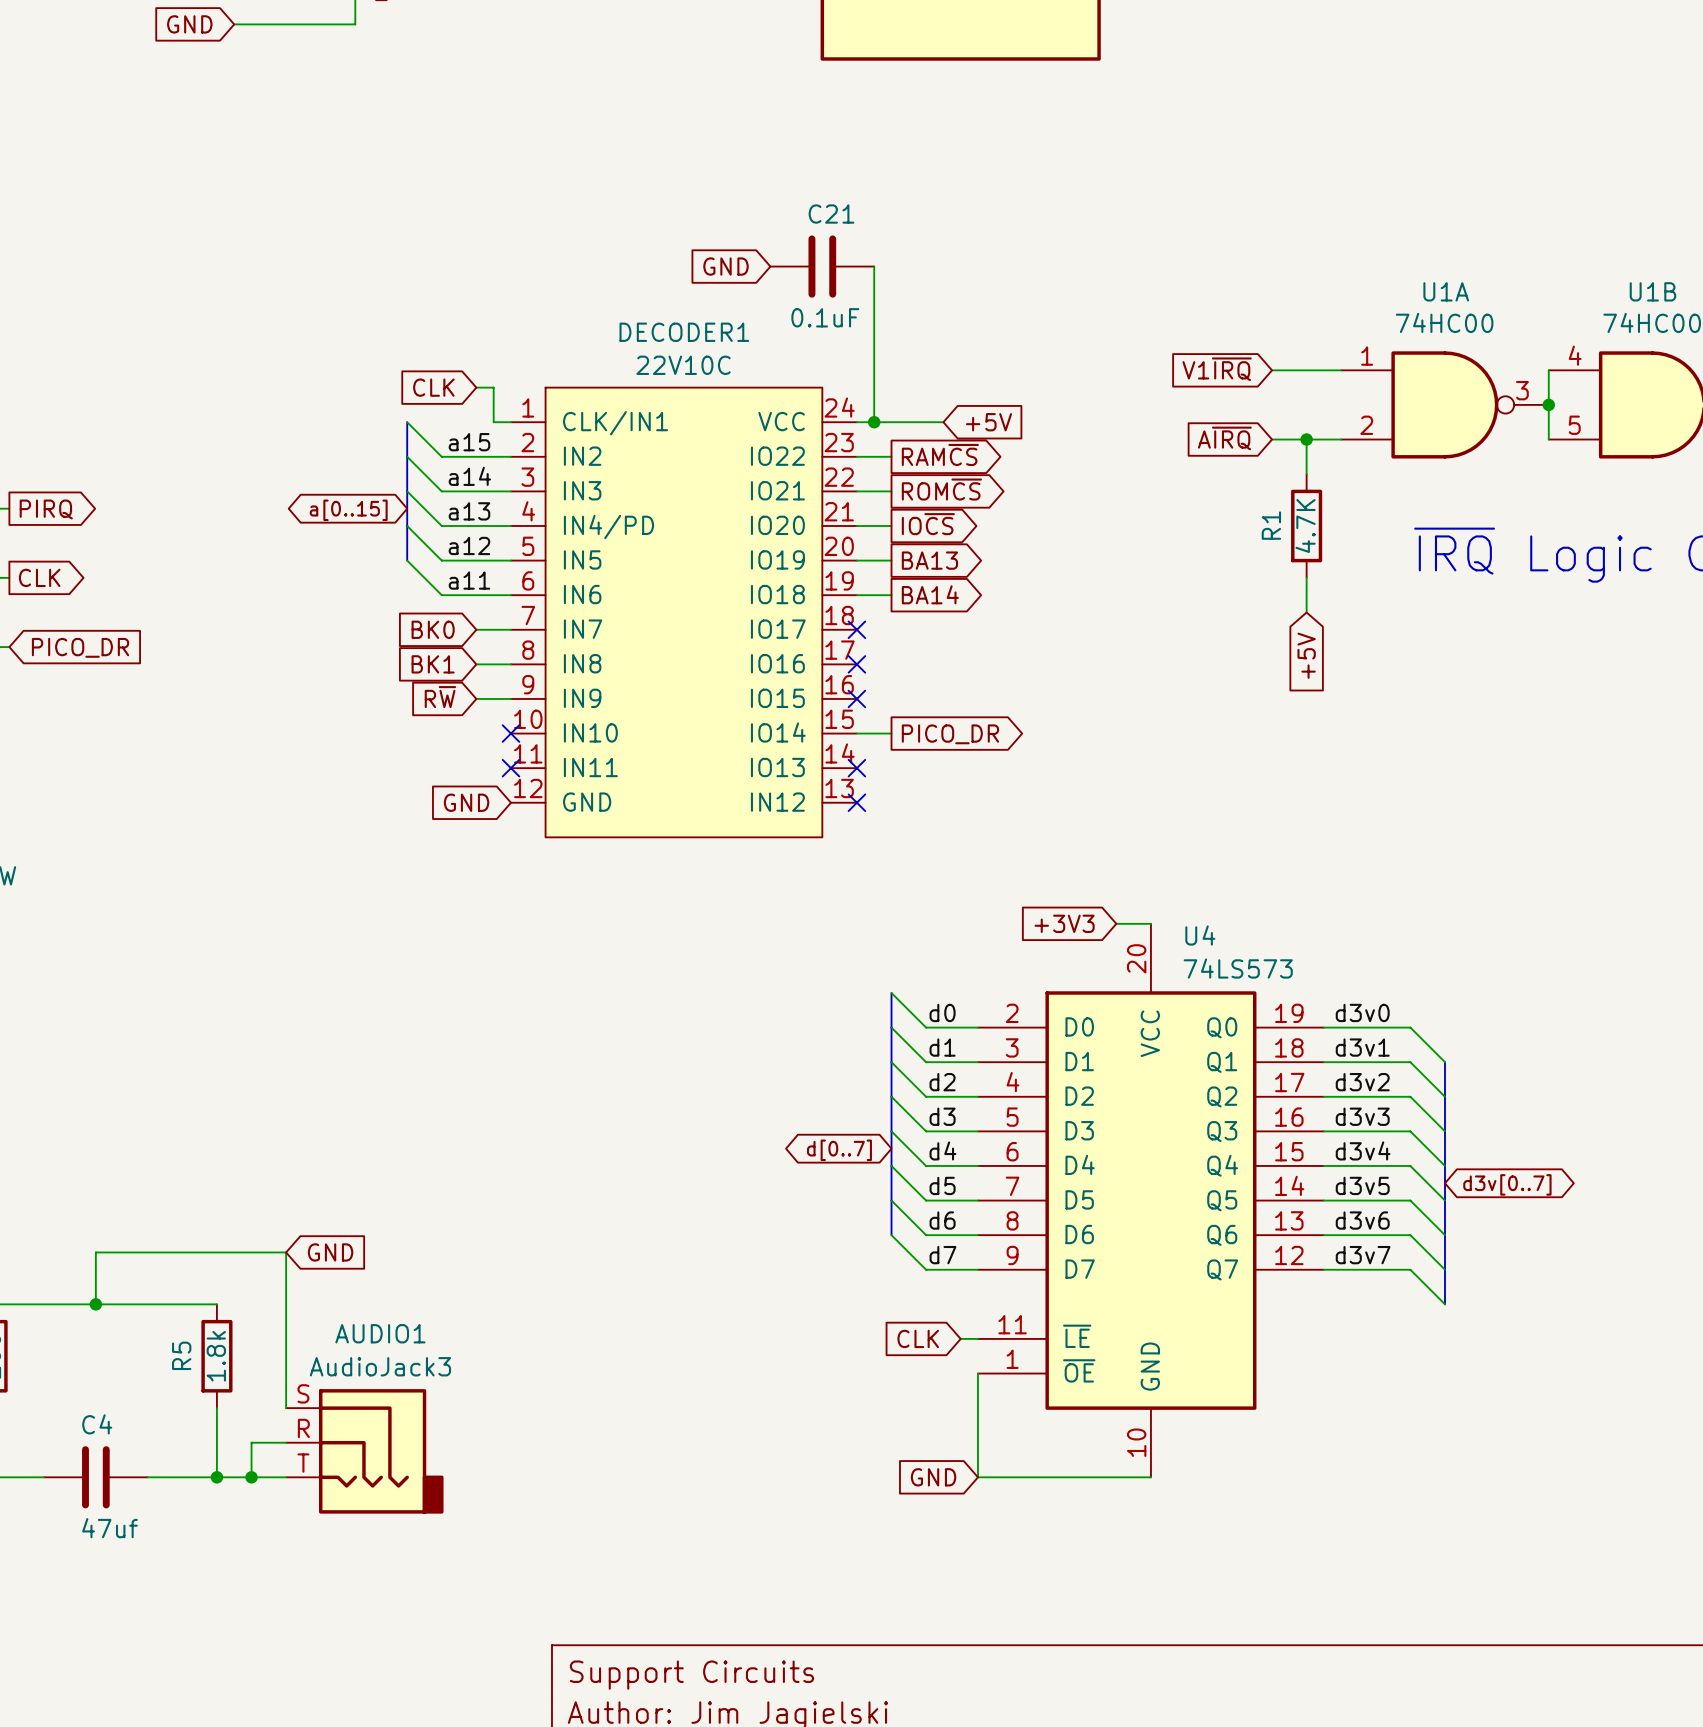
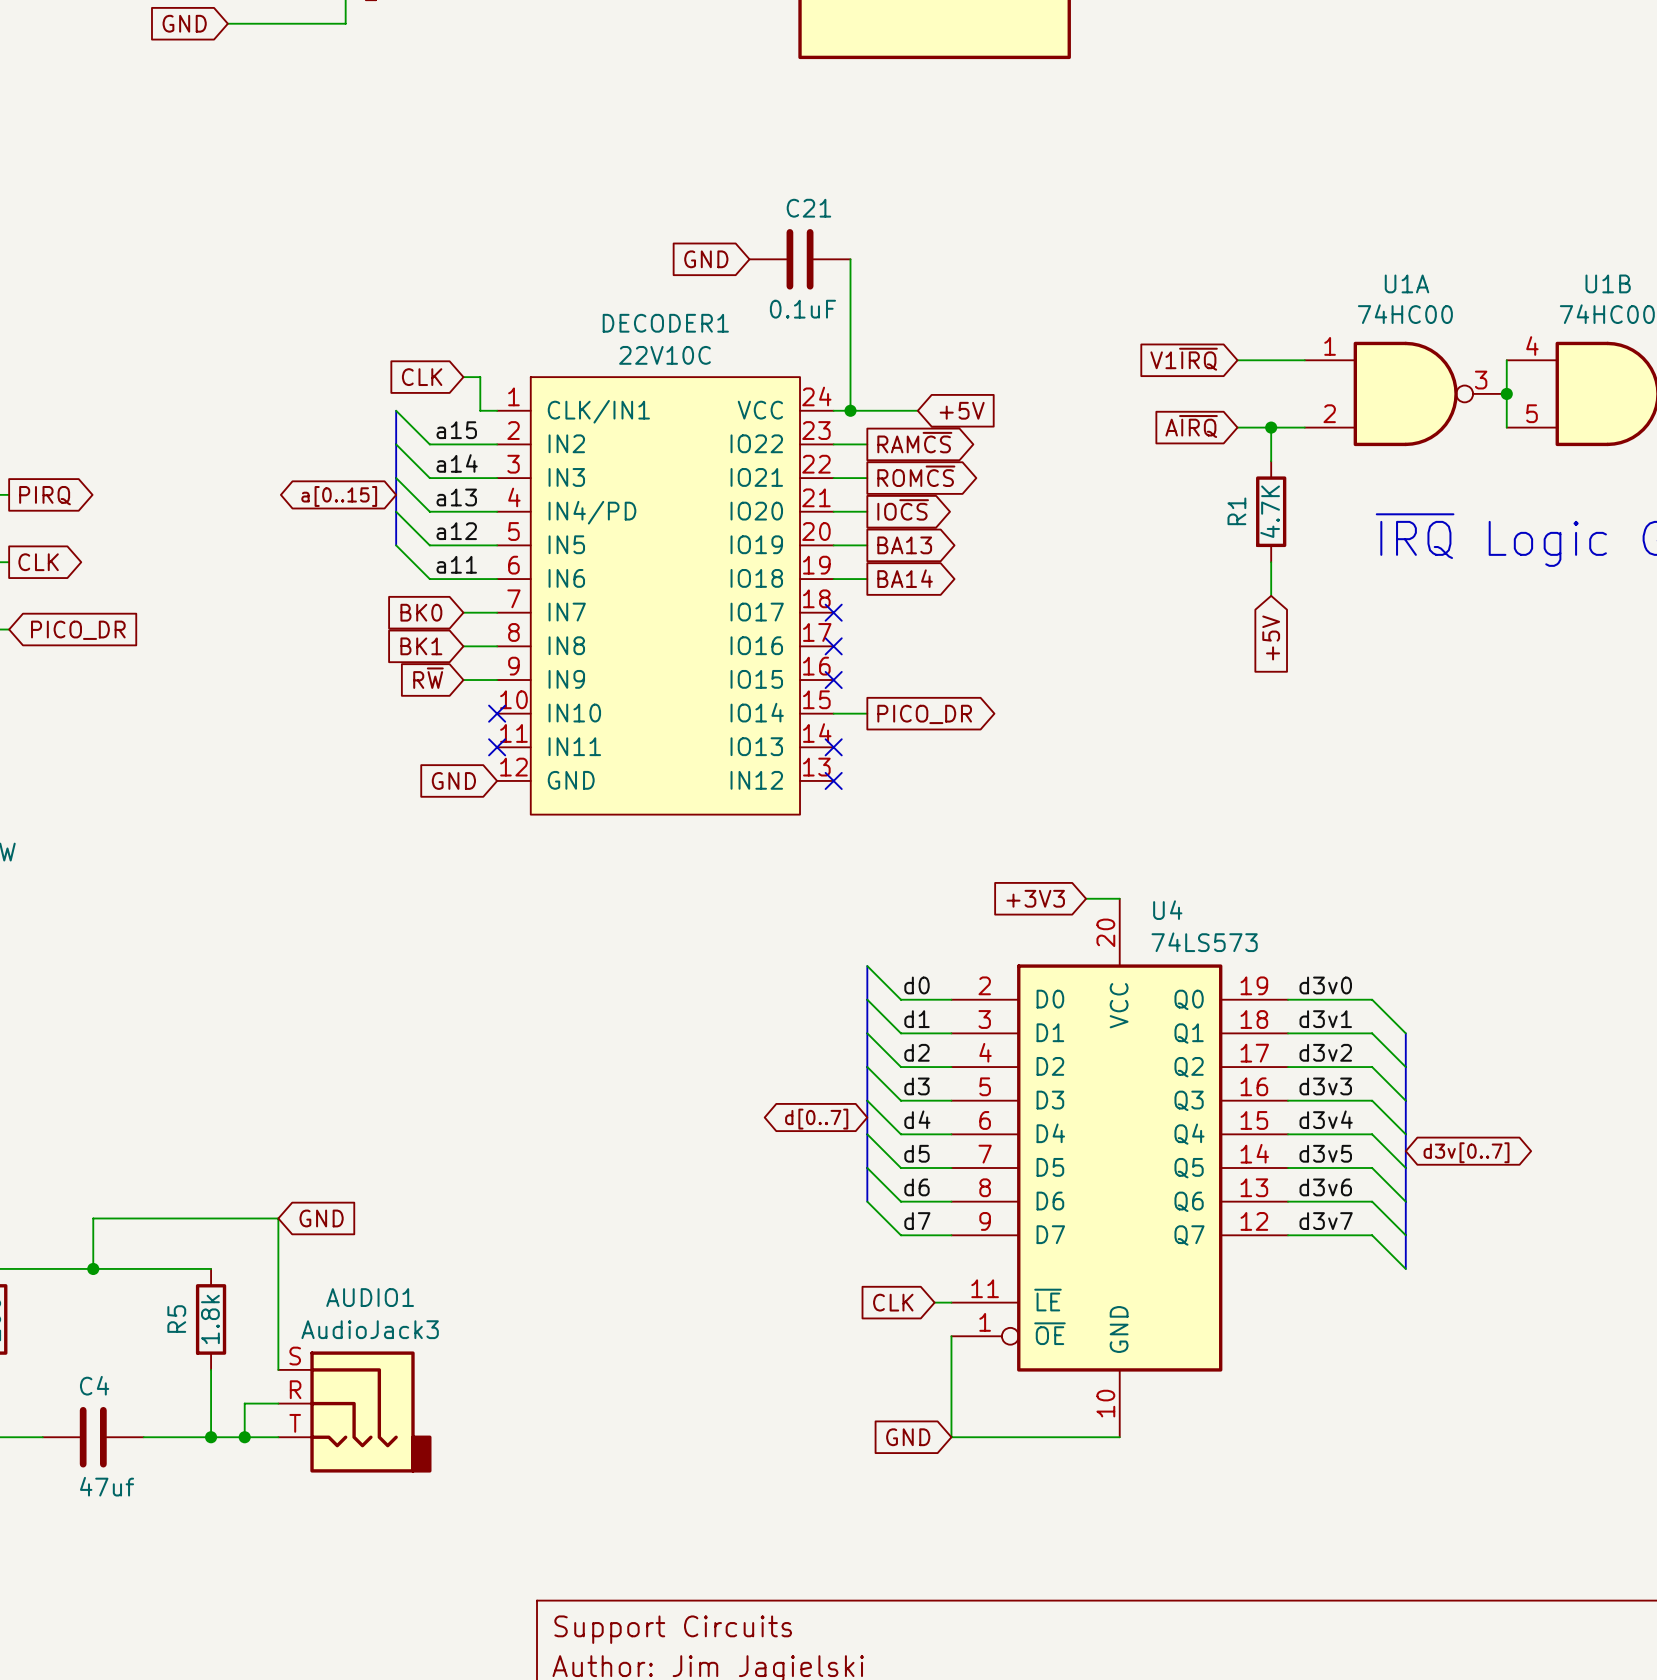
U4 symbol: [977, 923, 1324, 1478] -> [951, 898, 1289, 1438]

